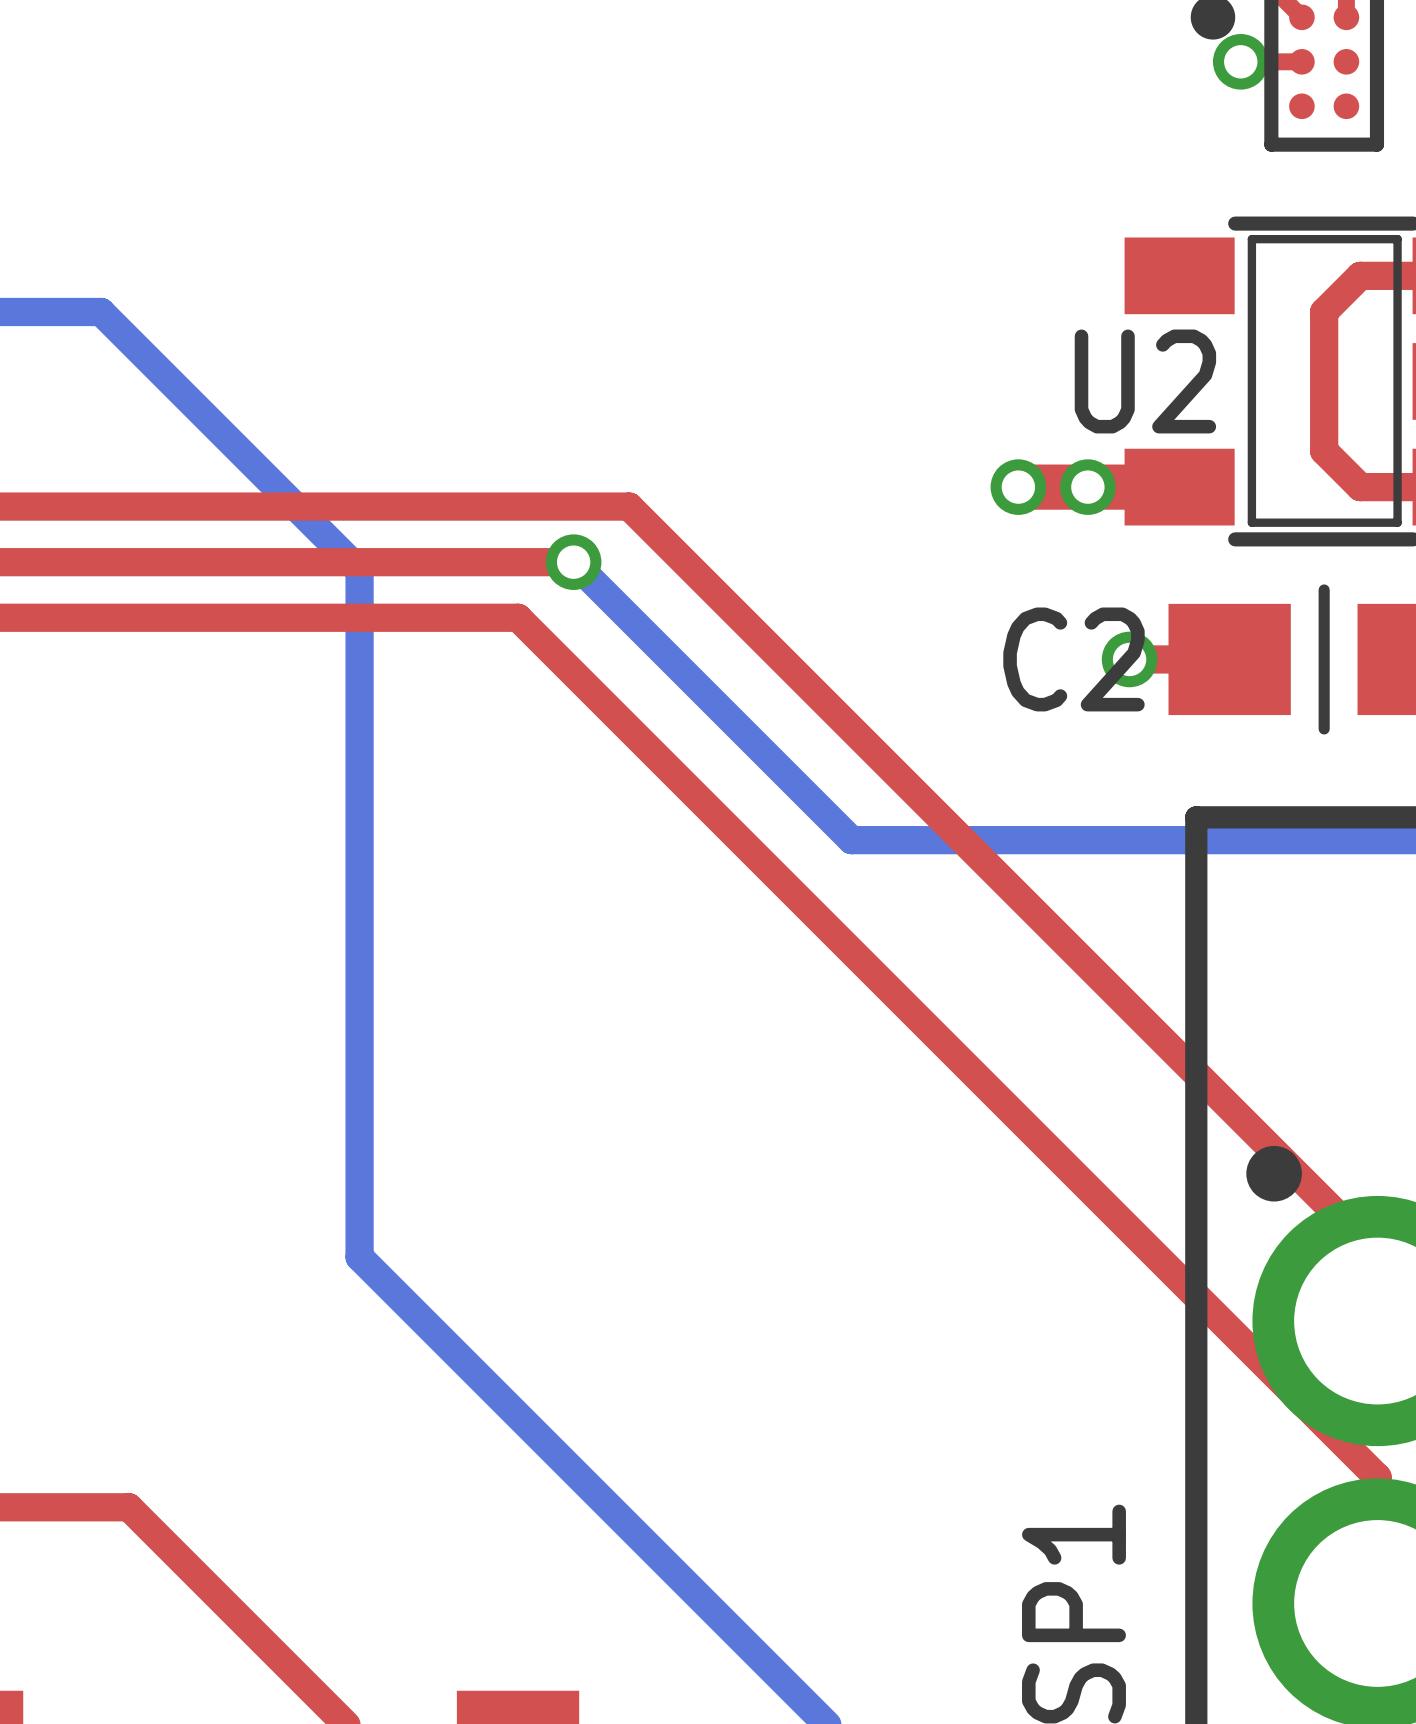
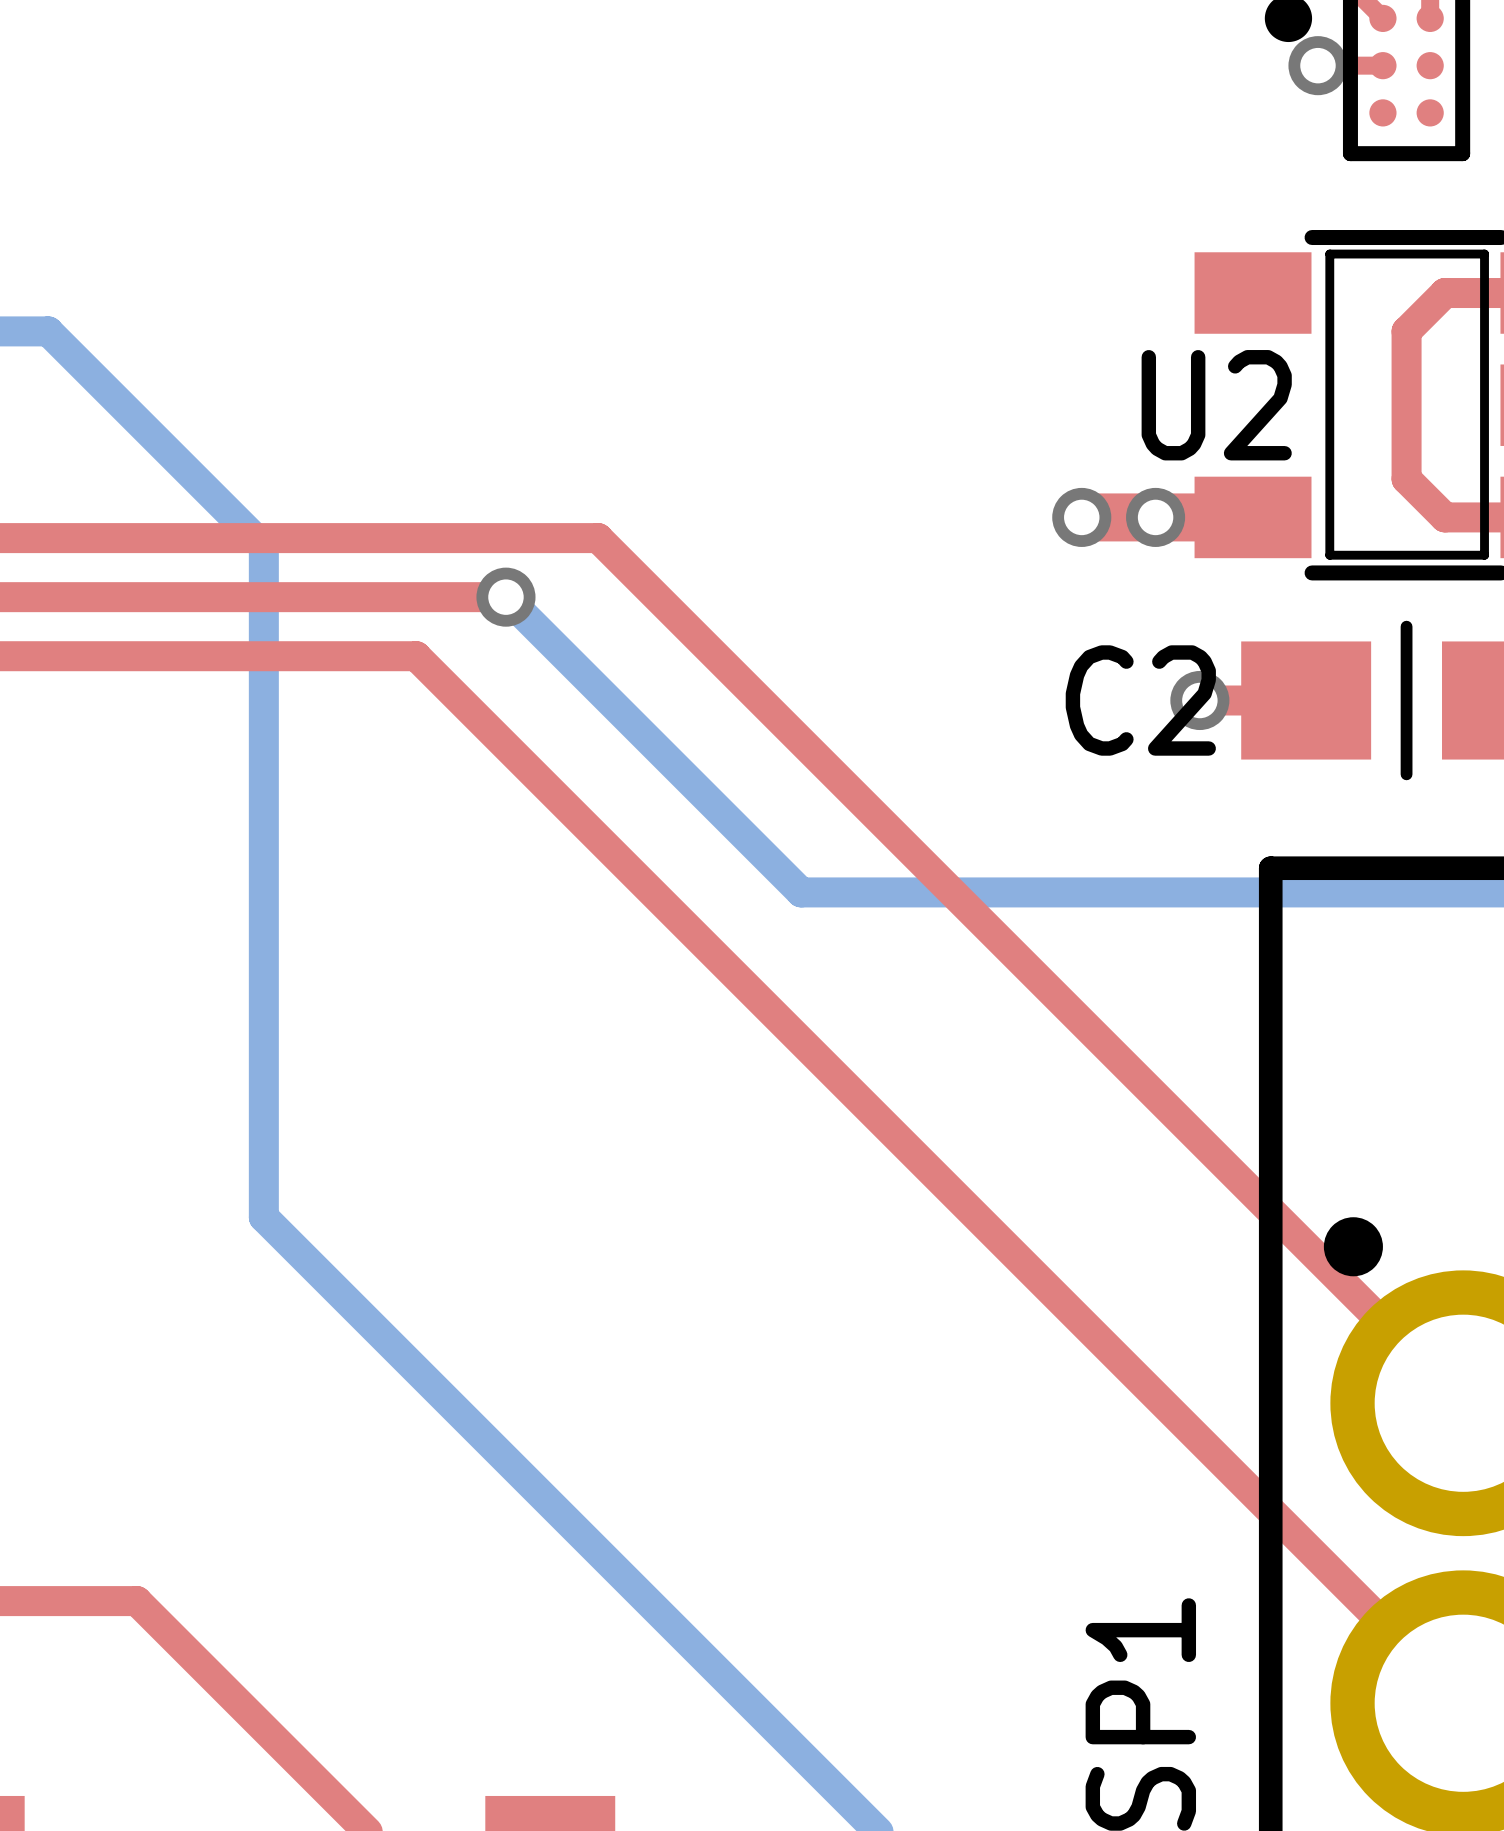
bottom track: (45, 311) (101, 311) (359, 570) (359, 1257) -> (48, 331) (263, 546) (263, 1217) (381, 1335)
top track: (563, 506) (629, 506) (1377, 1254) (1377, 1321) -> (598, 538) (1463, 1403)
top track: (476, 562) (573, 562) -> none
bottom track: (573, 562) (851, 840) -> (505, 597) (801, 892) (904, 892)
via position: (573, 562) -> (505, 597)
top track: (391, 617) (518, 617) (1377, 1477) (1377, 1603) -> (416, 656) (1463, 1703)

